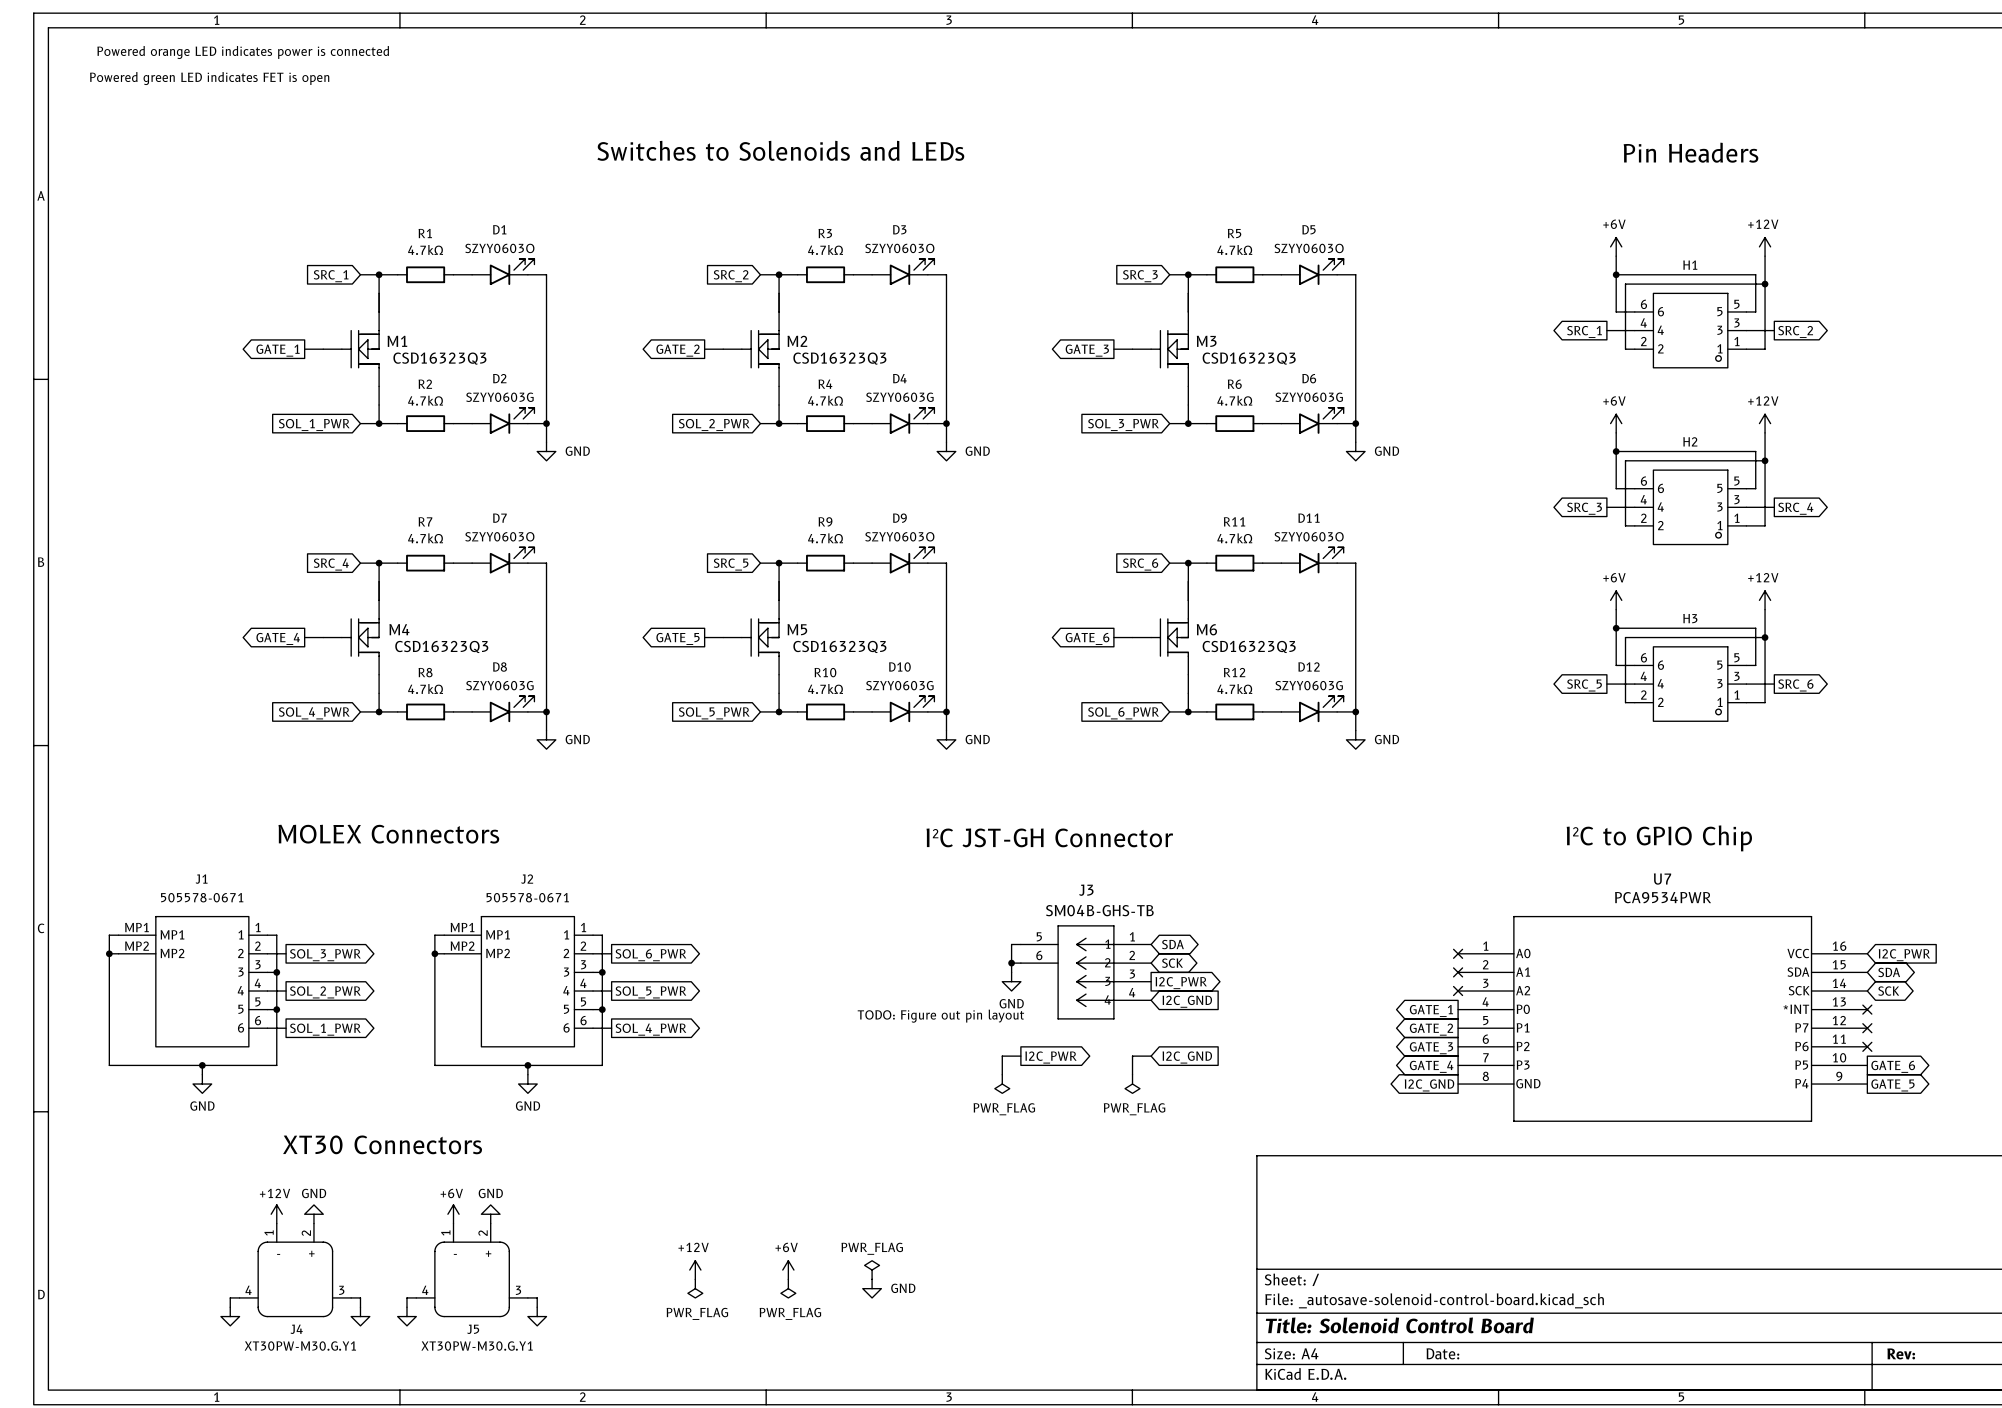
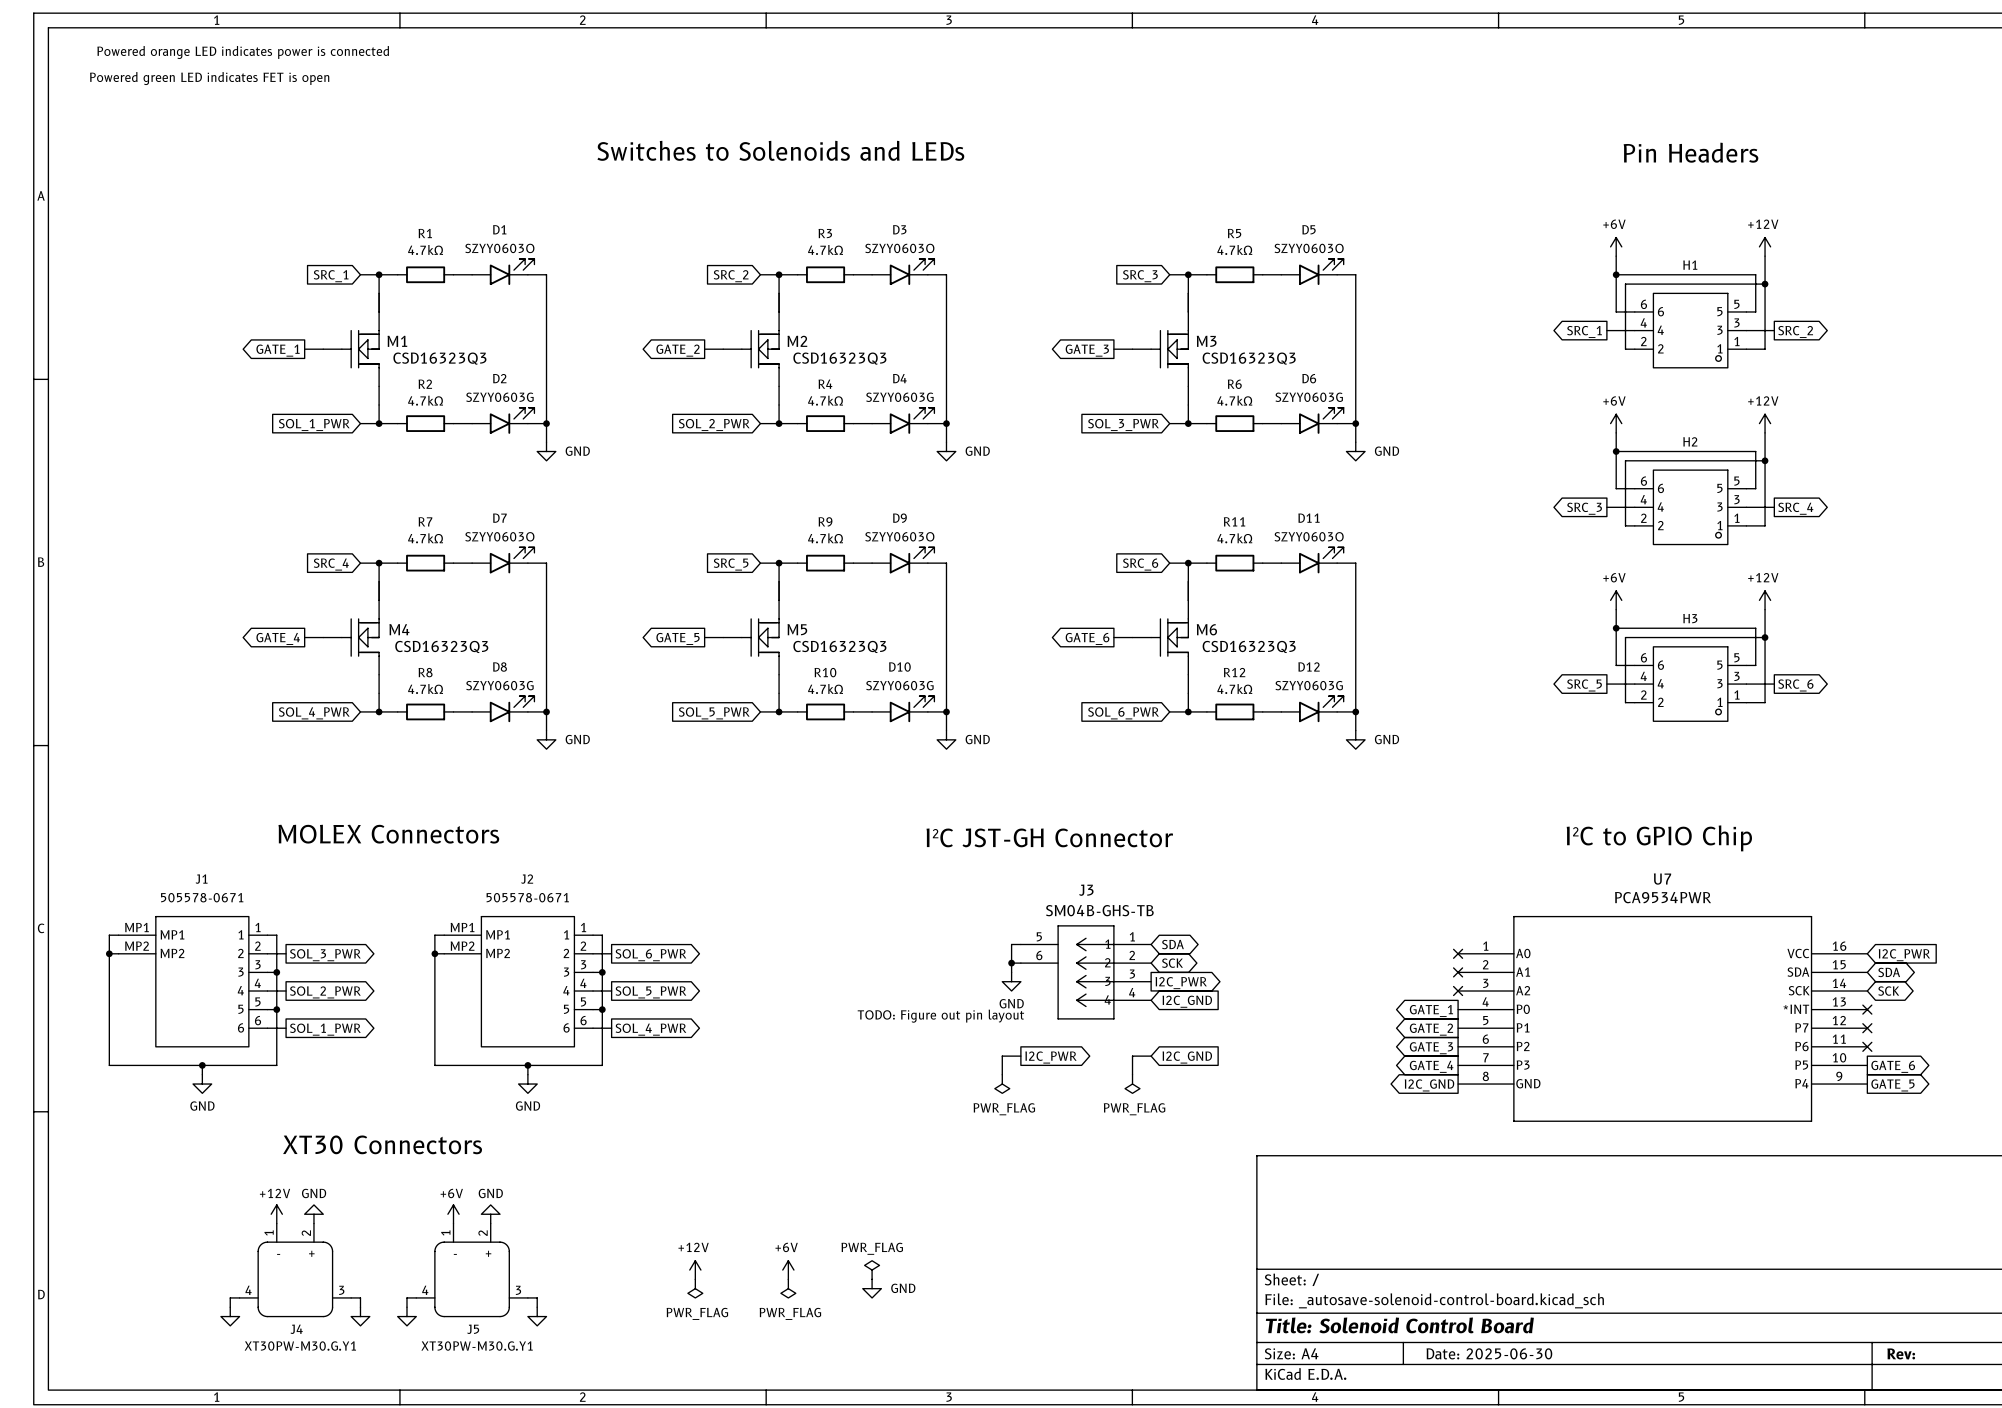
title block: Date: (1442, 1353) -> Date: 2025-06-30 (1489, 1353)

